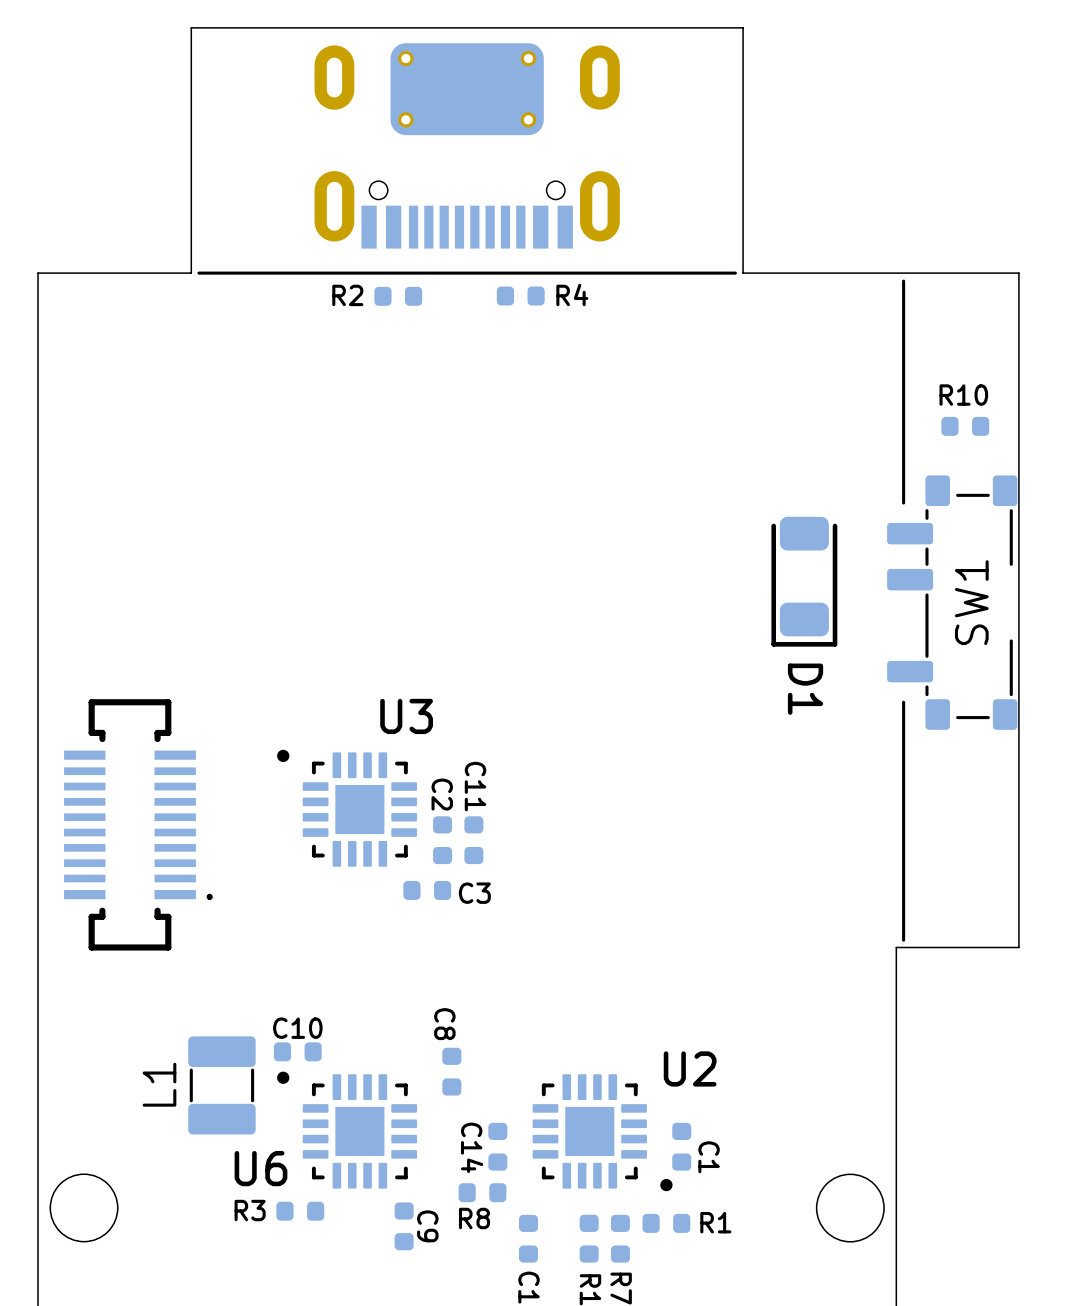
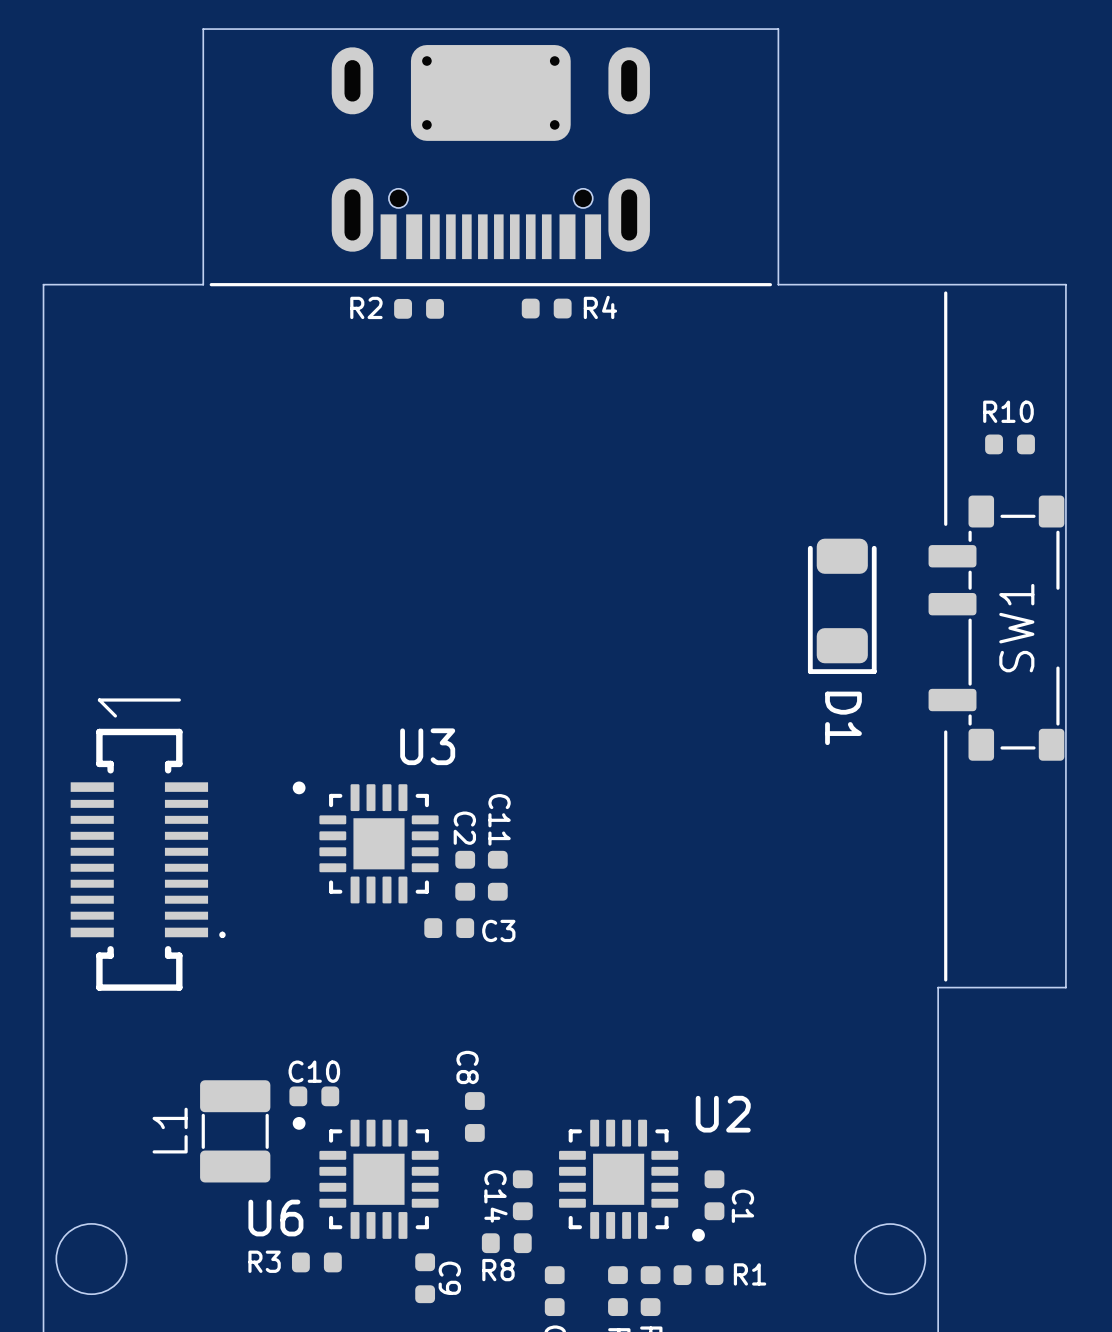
line: none -> (179, 700) (99, 700) (115, 716)

